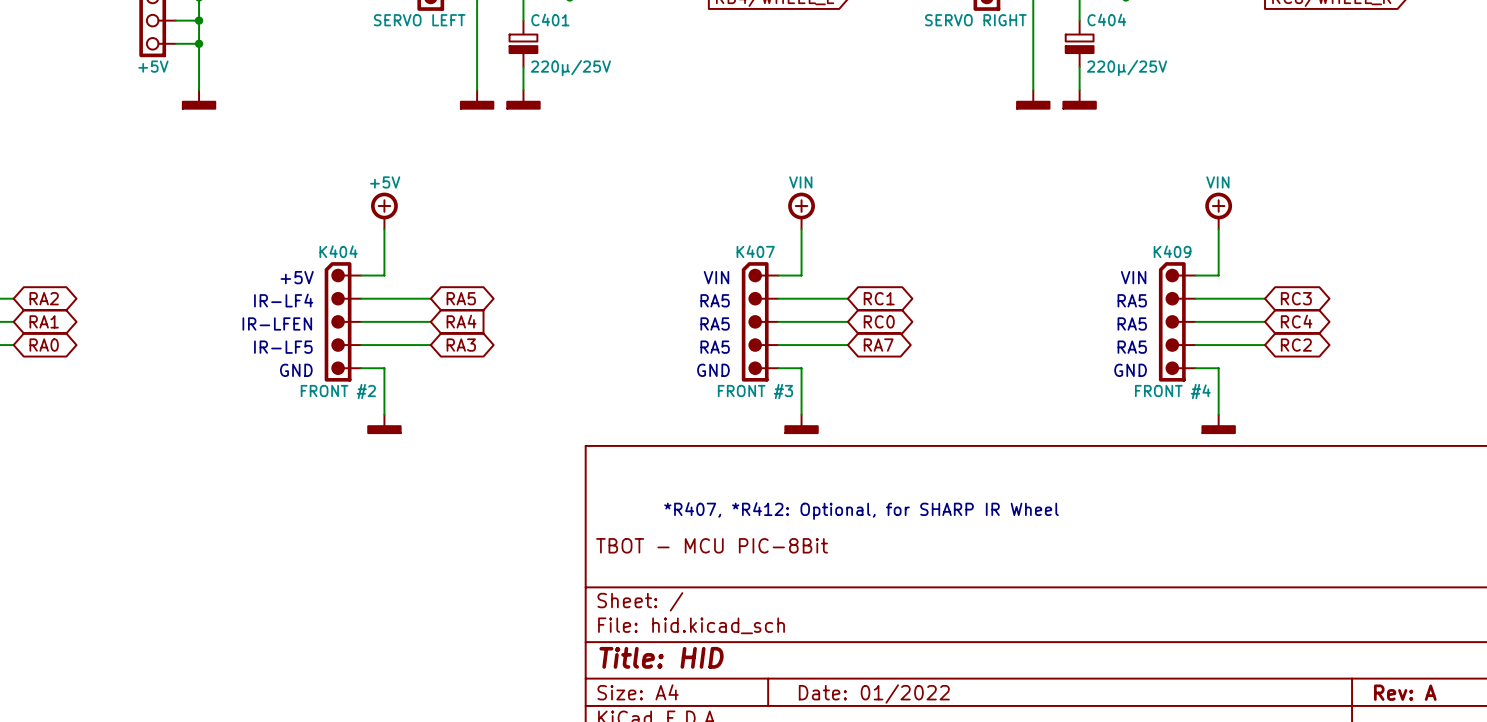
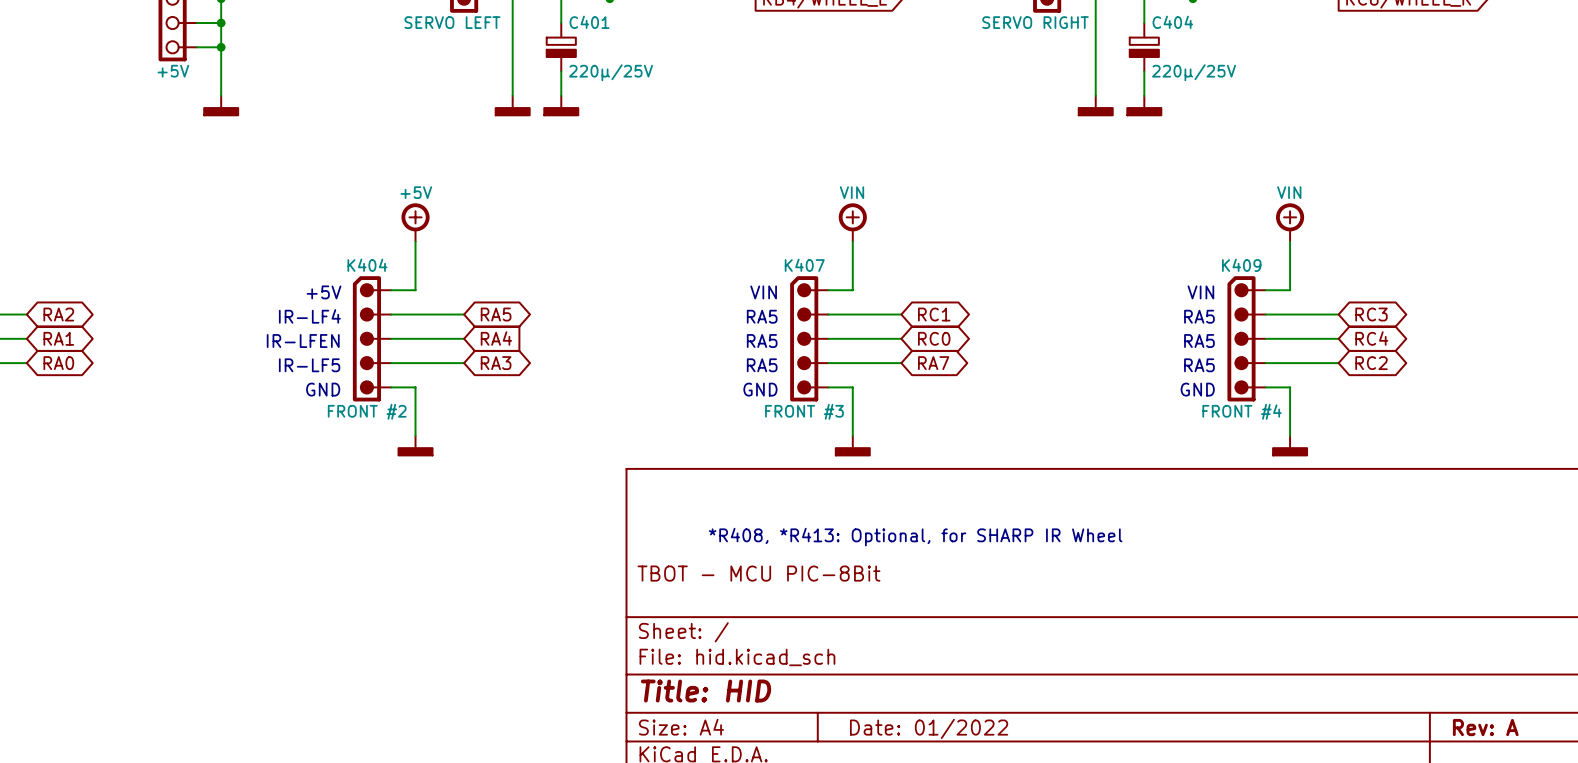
text: *R407, *R412: Optional, for SHARP IR Wheel (861, 511) -> *R408, *R413: Optional, for SHARP IR Wheel (915, 537)

